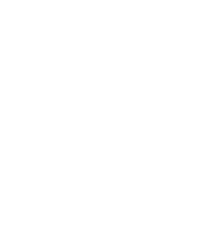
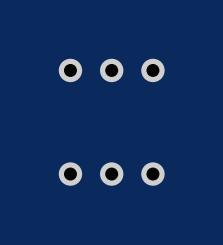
part: none -> (111, 70)
part: none -> (111, 174)

